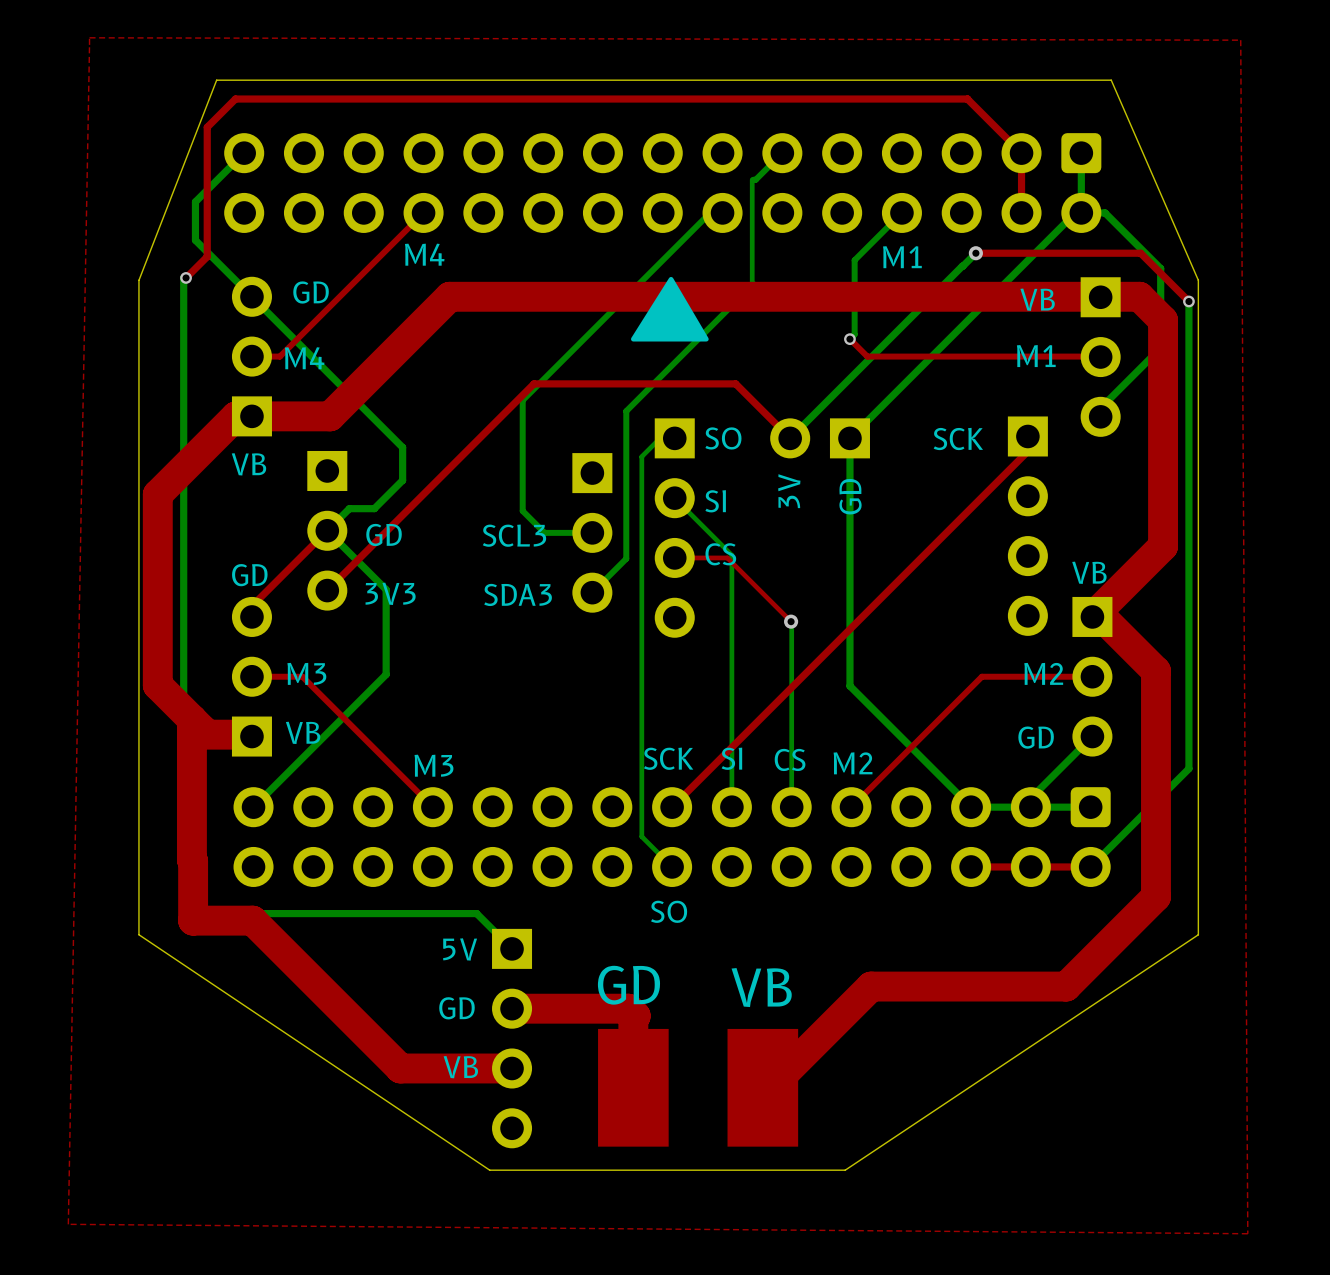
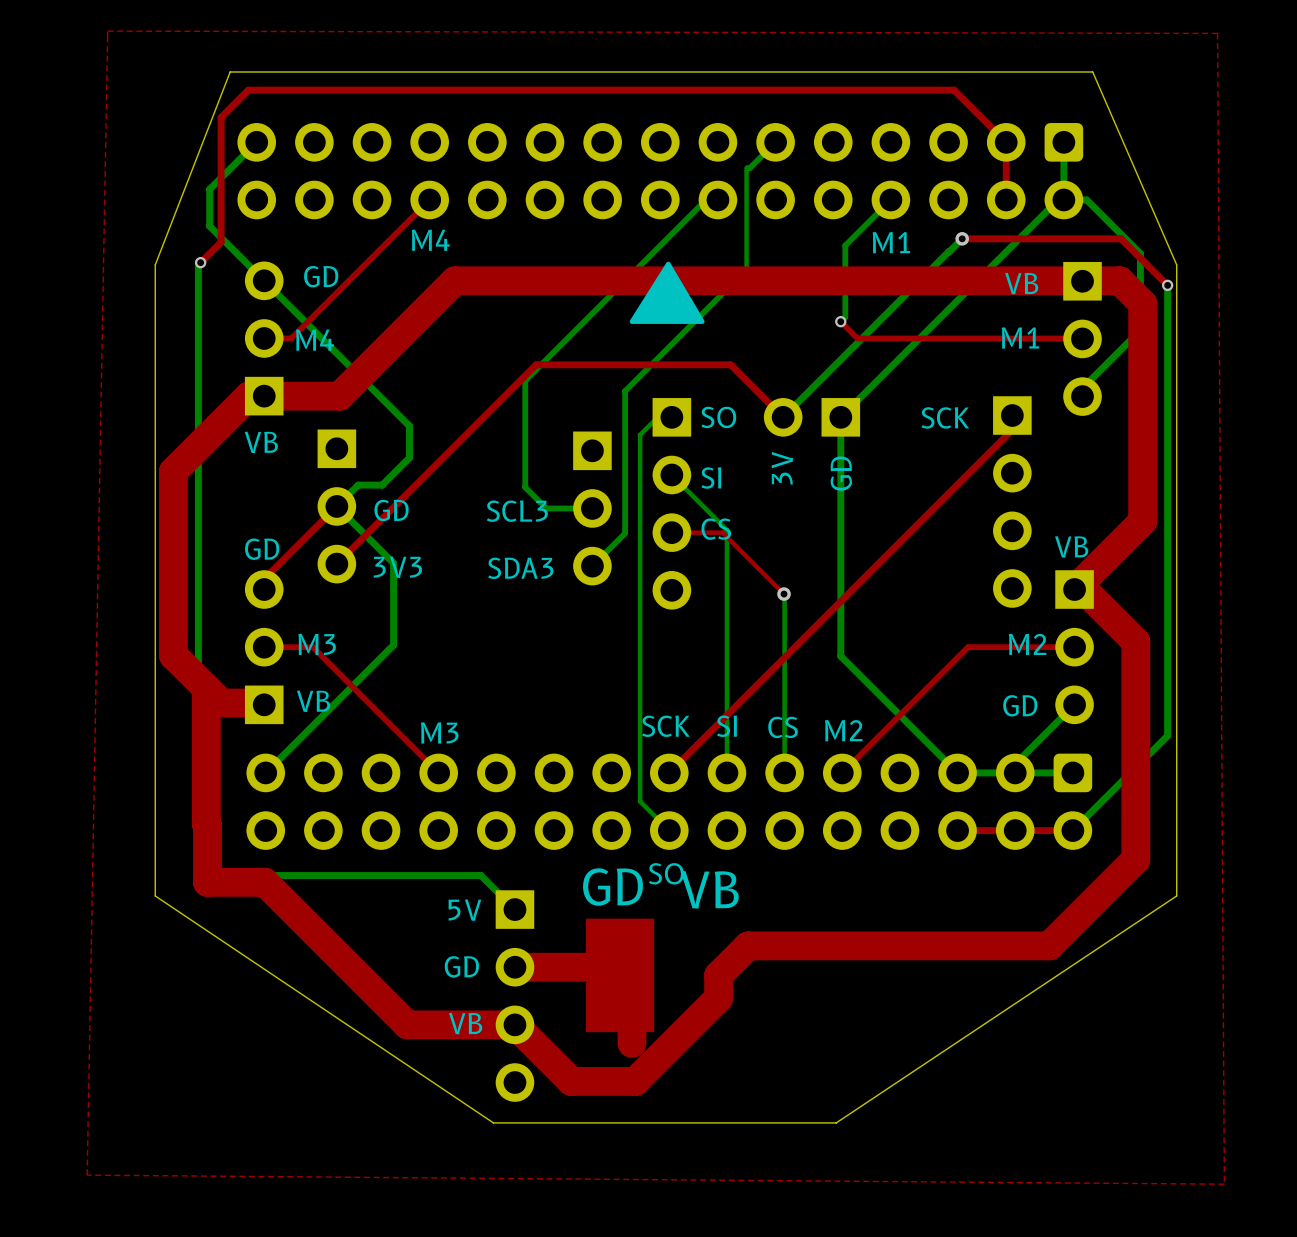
text position: GD (628, 985) -> GD (612, 887)
top track: (871, 986) (769, 1087) (762, 1087) -> (861, 945) (748, 945) (718, 975) (718, 998) (635, 1081) (571, 1081) (514, 1024)
text position: VB (761, 987) -> VB (709, 889)
part position: (633, 1087) -> (620, 975)
part: (762, 1087) -> none

